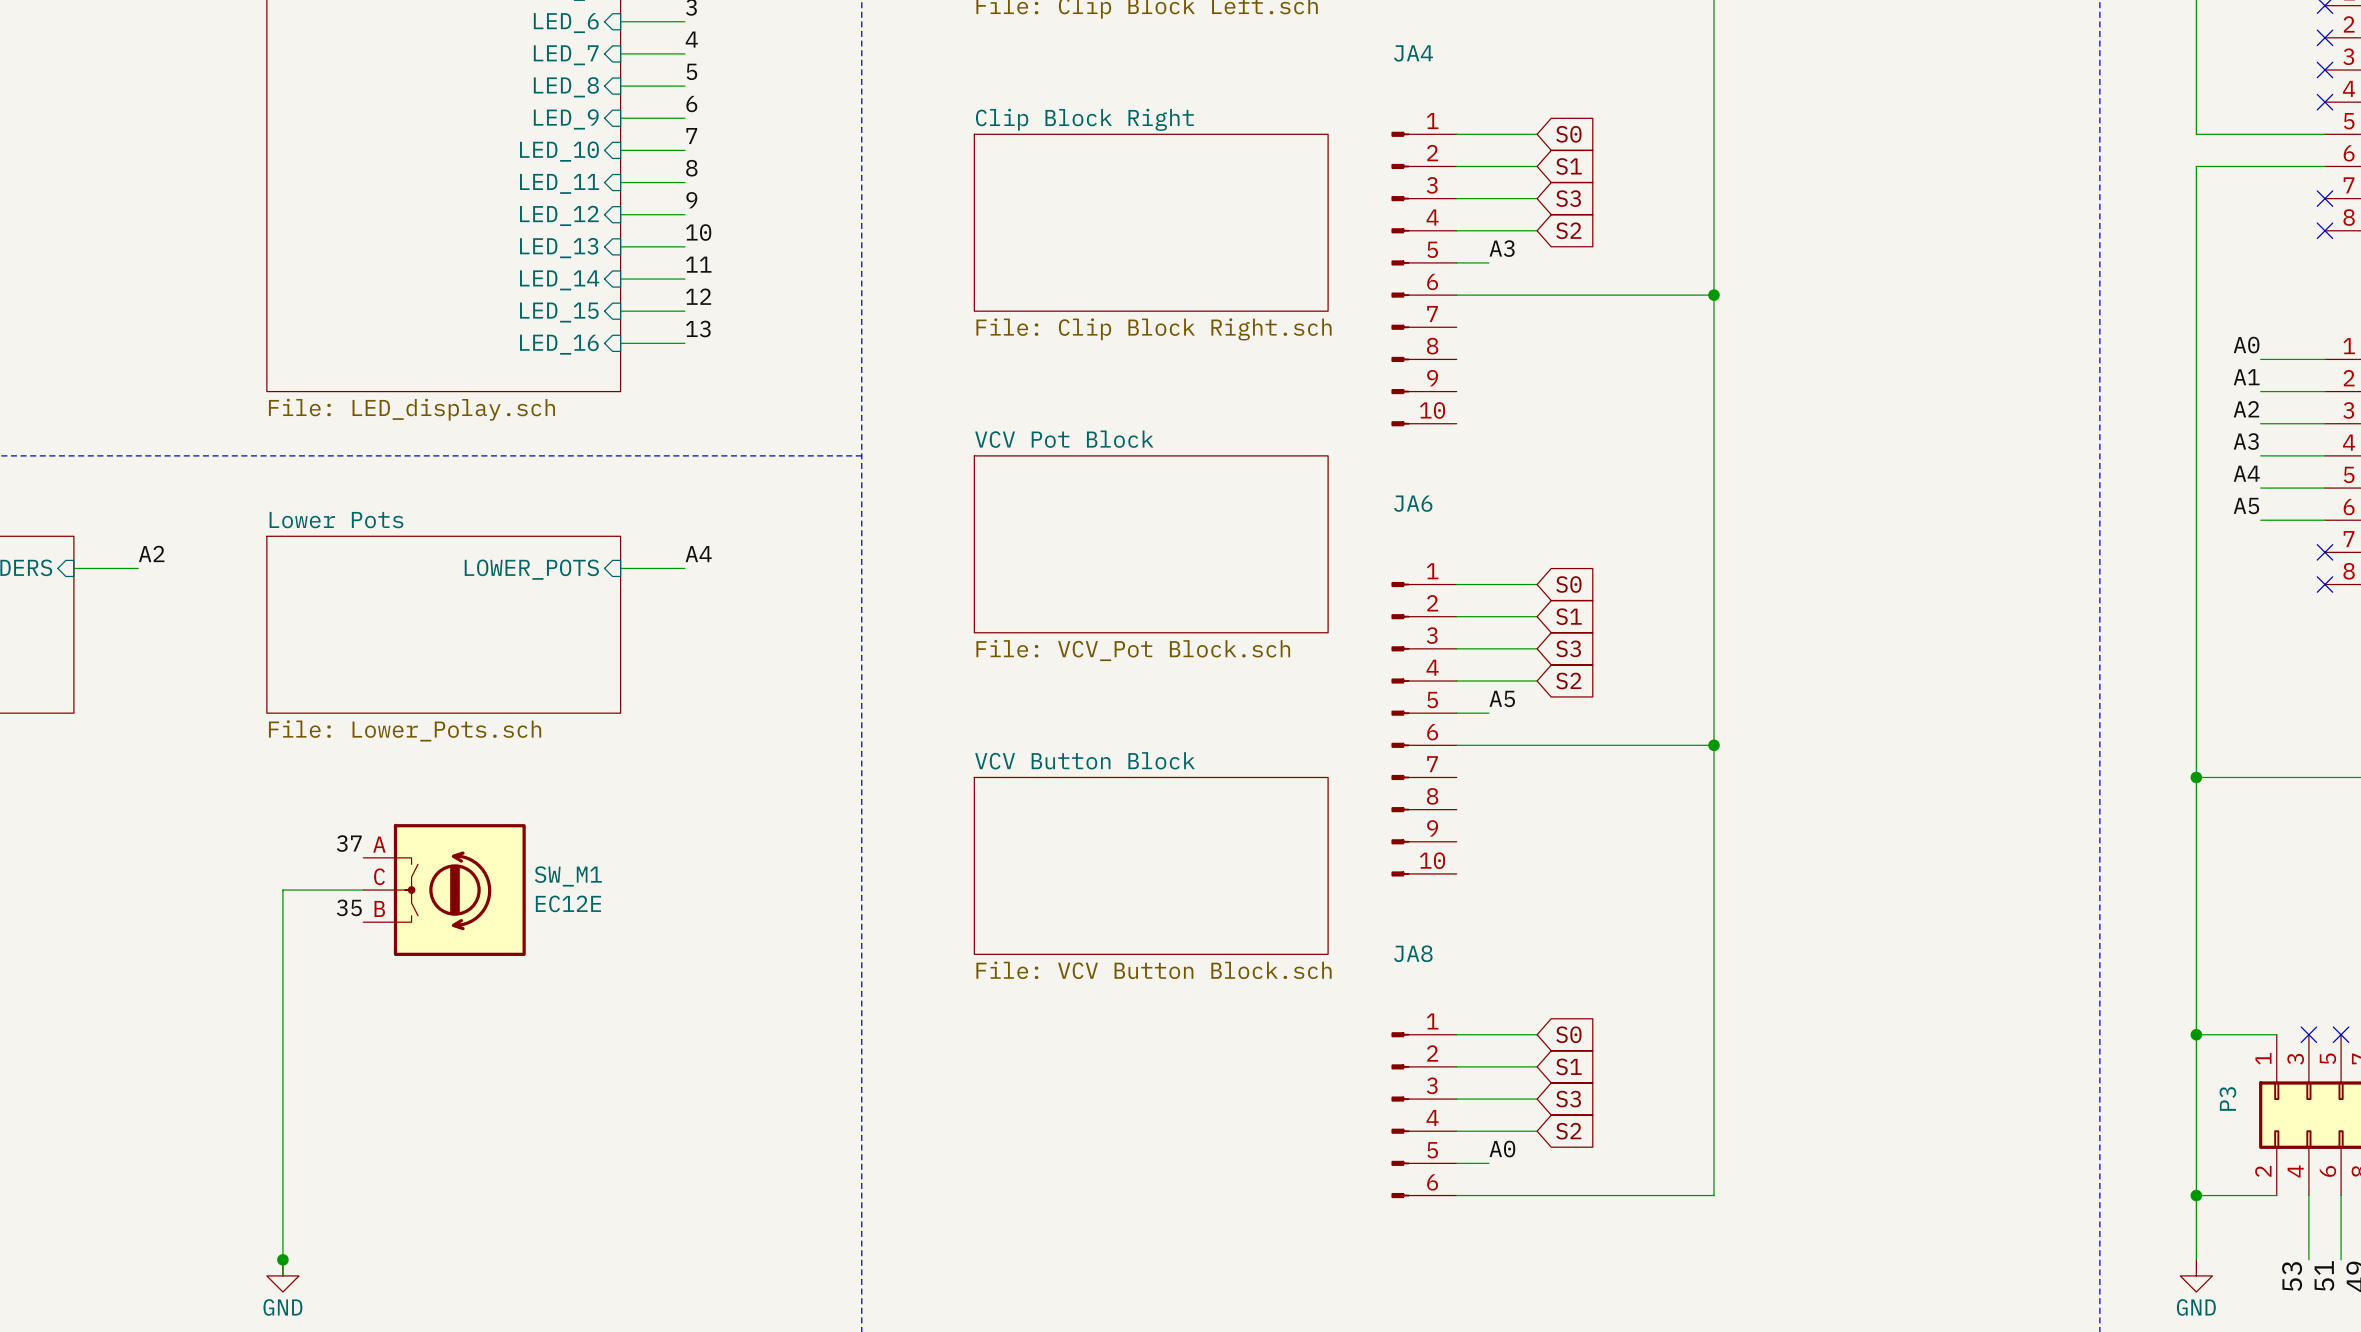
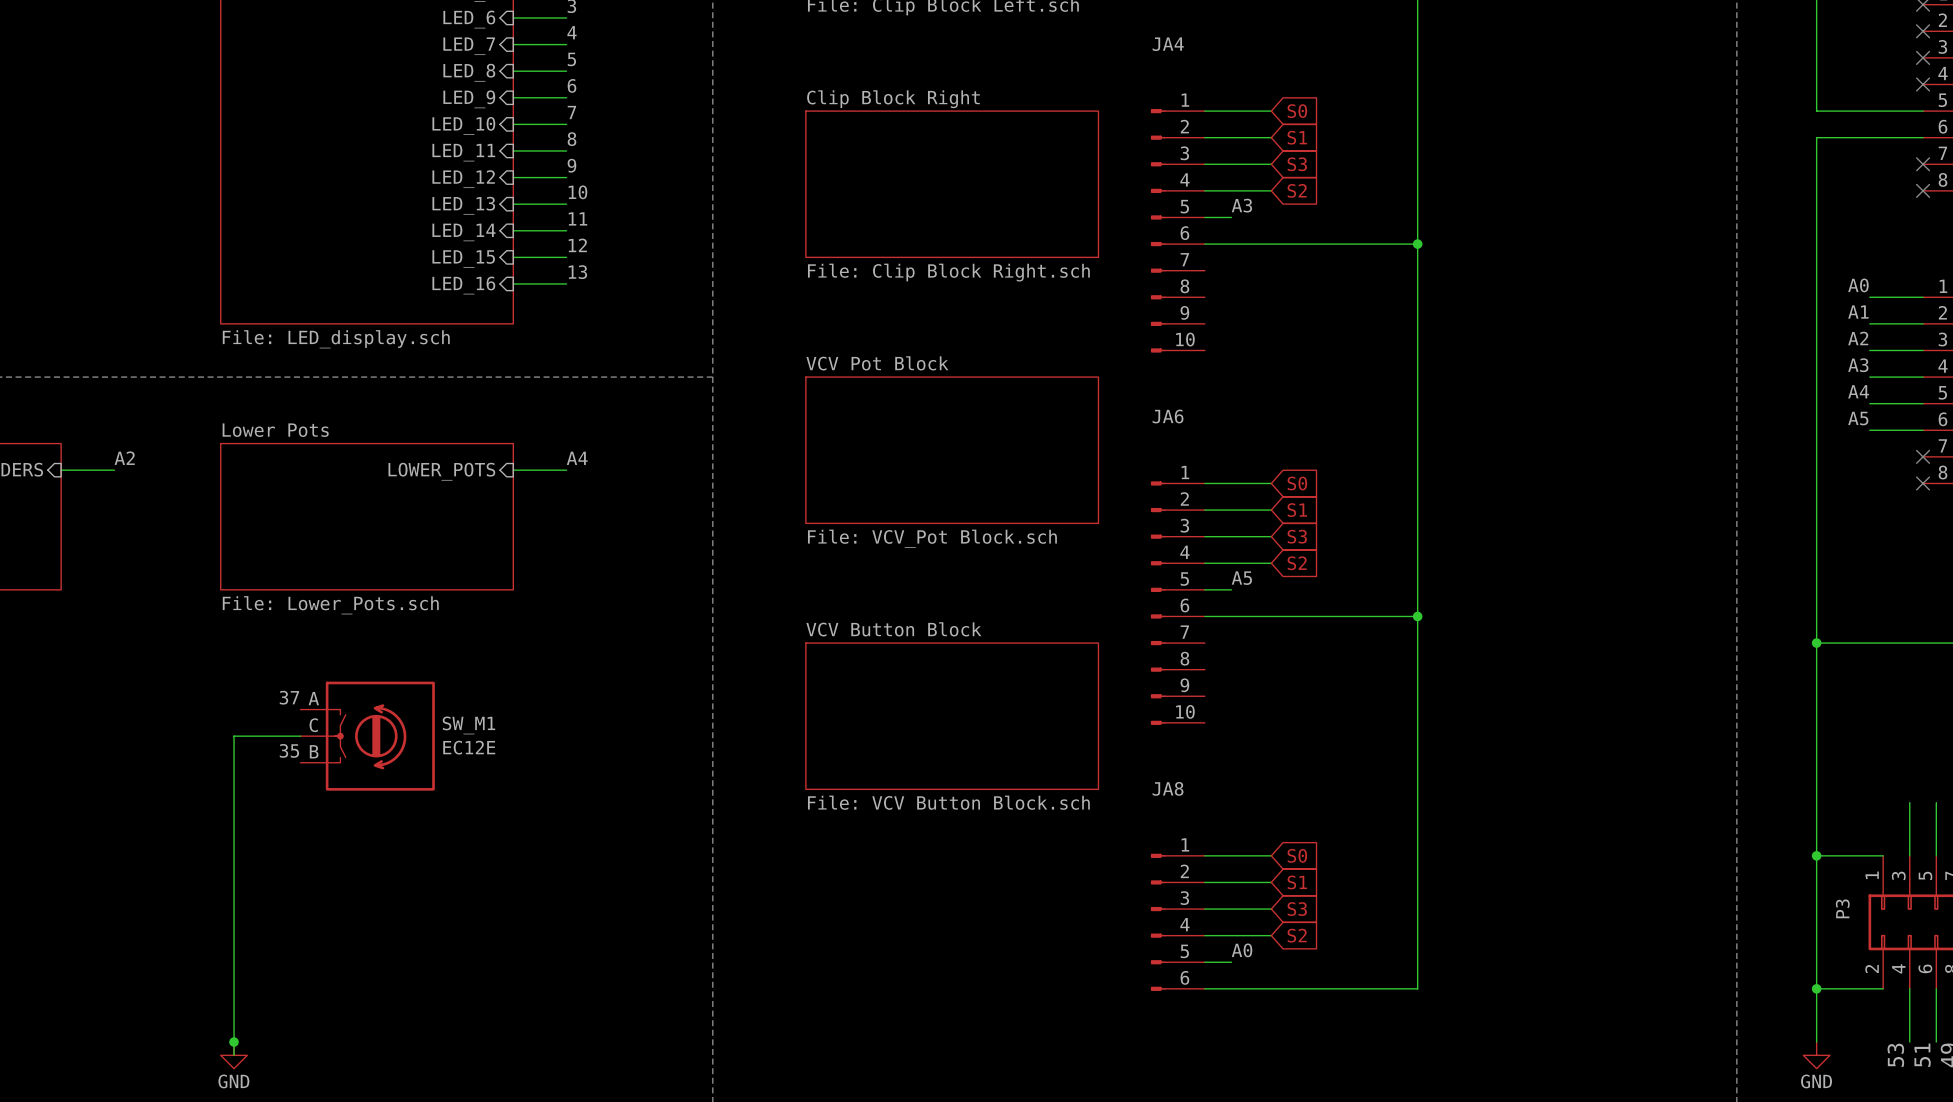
wire: none -> (1909, 802) (1909, 855)
wire: none -> (1936, 802) (1936, 855)
no-connect mark: (2308, 1034) -> none
no-connect mark: (2341, 1034) -> none

